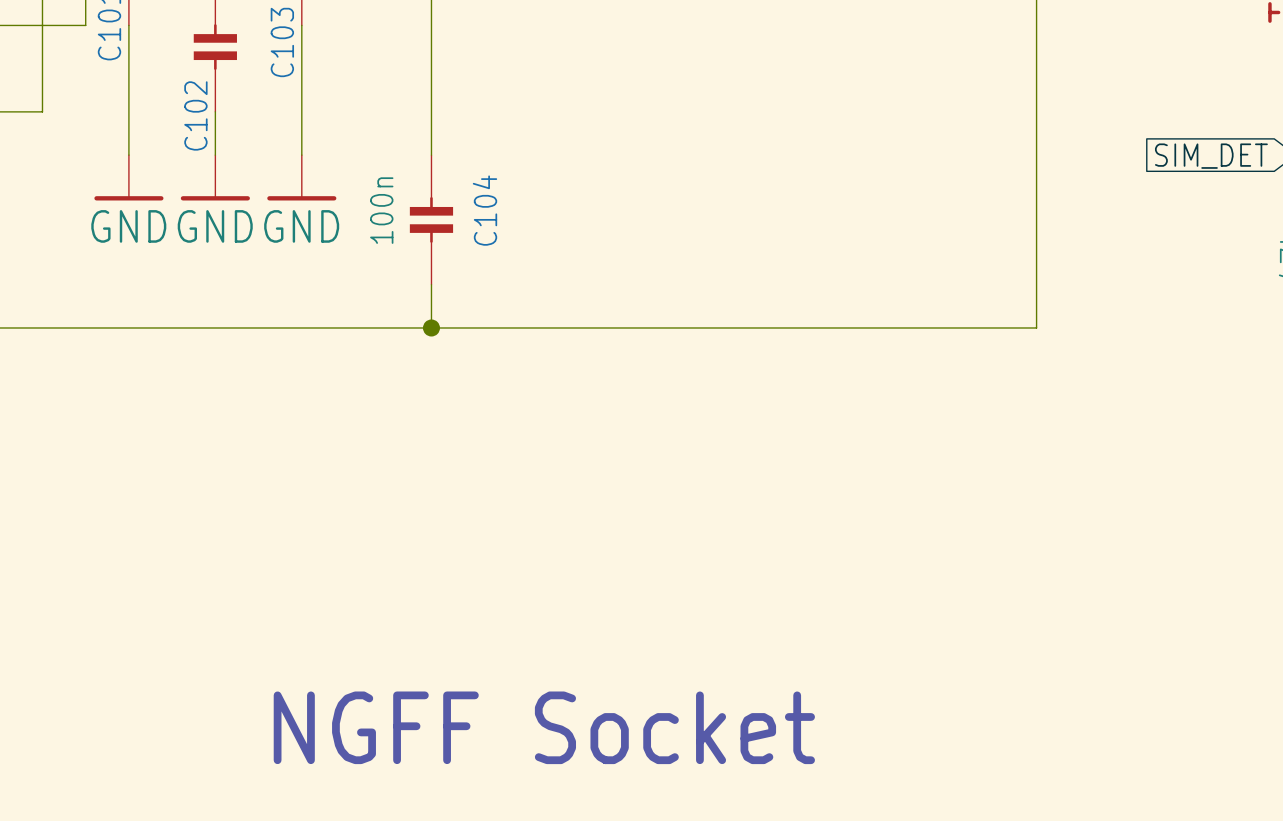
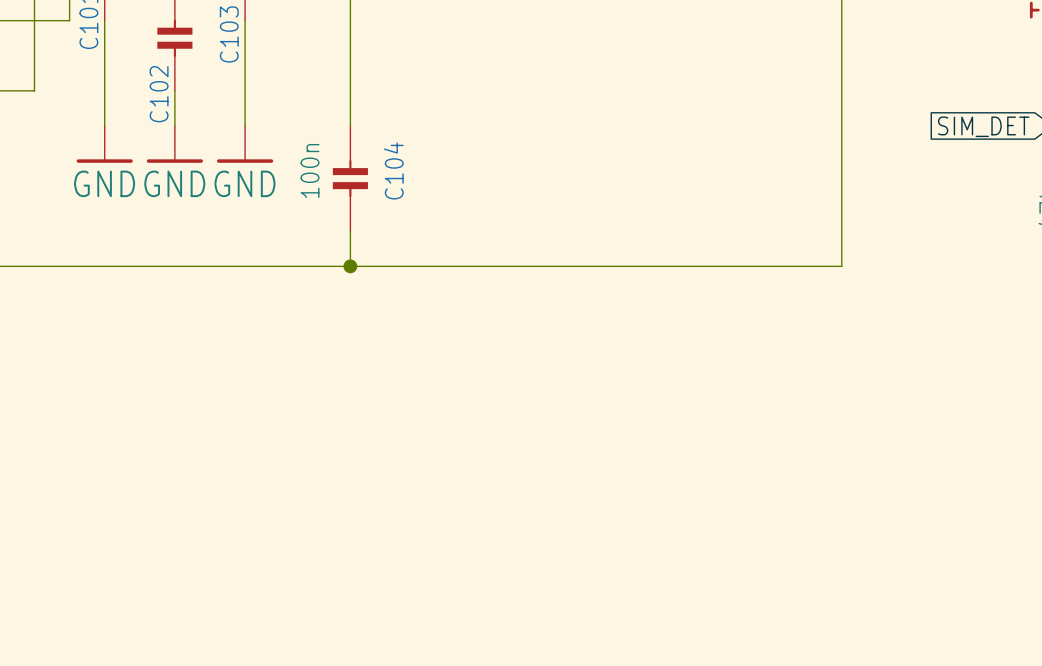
text: NGFF Socket (544, 727) -> none

